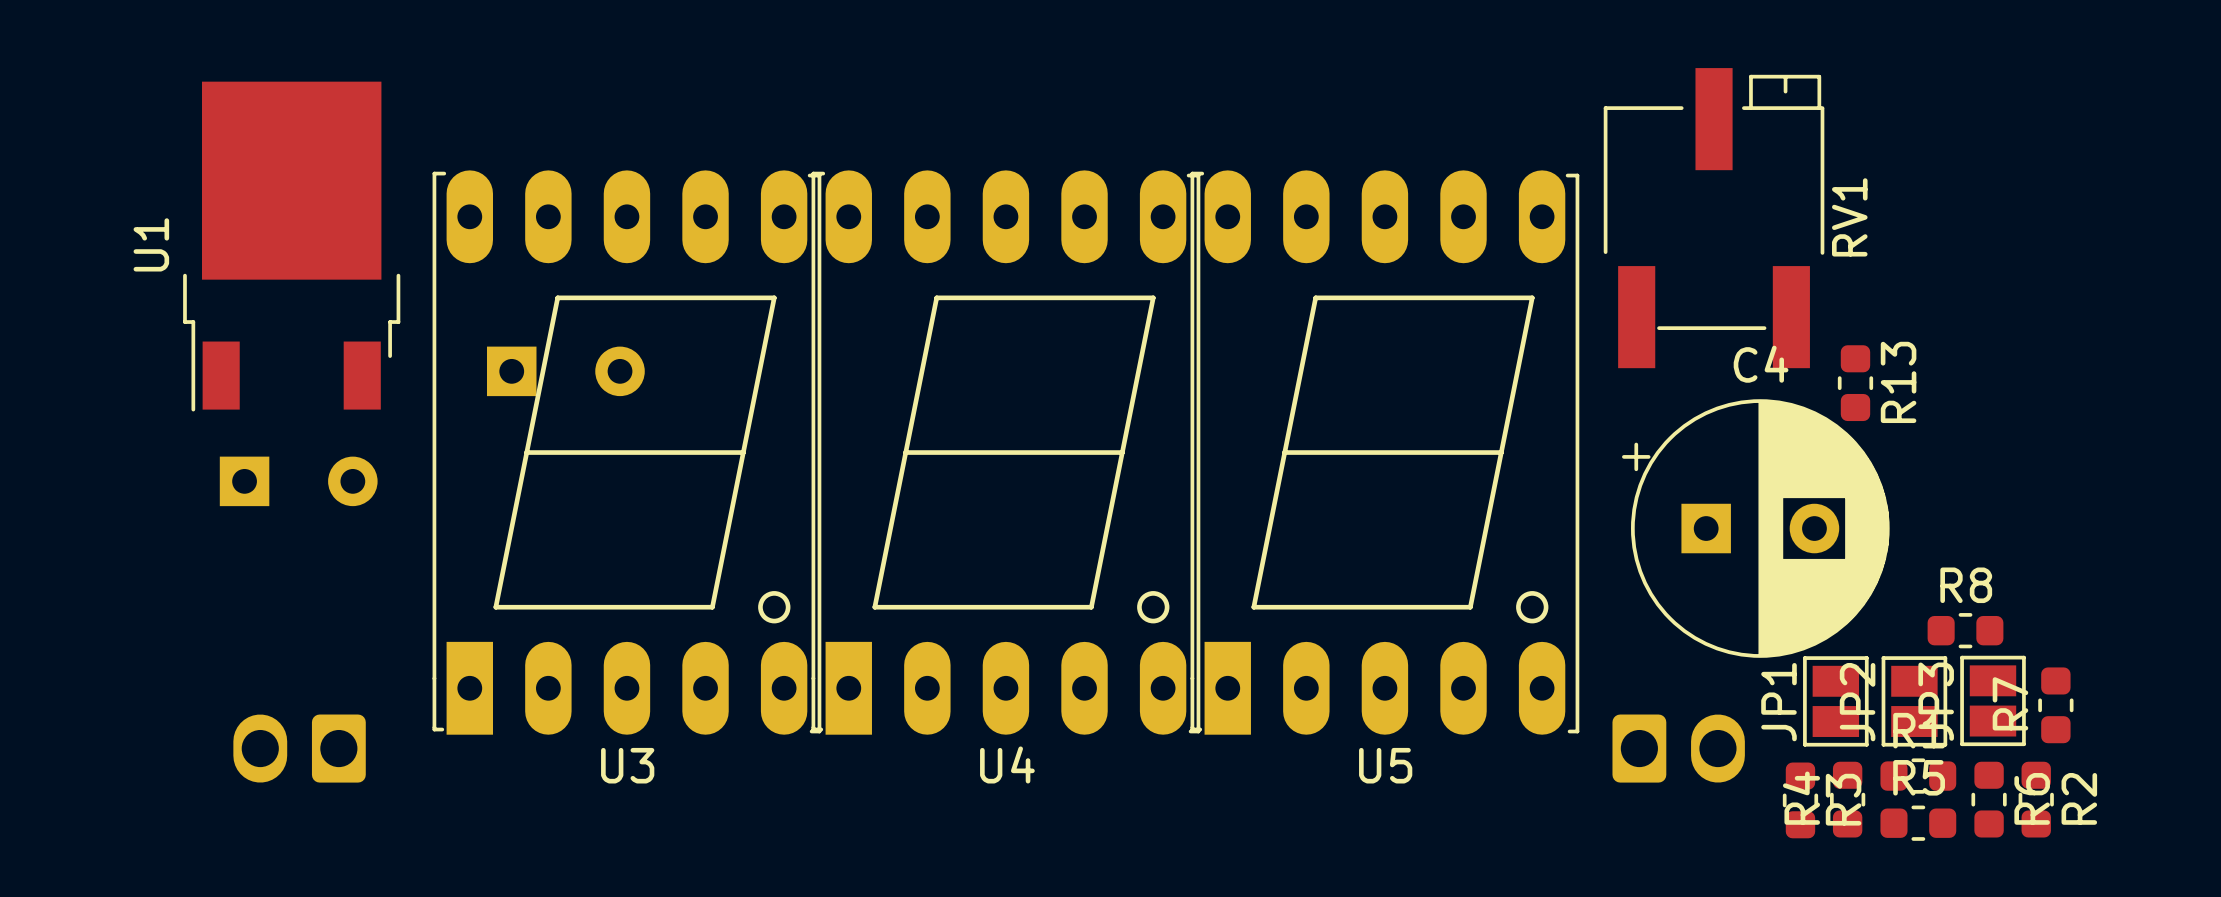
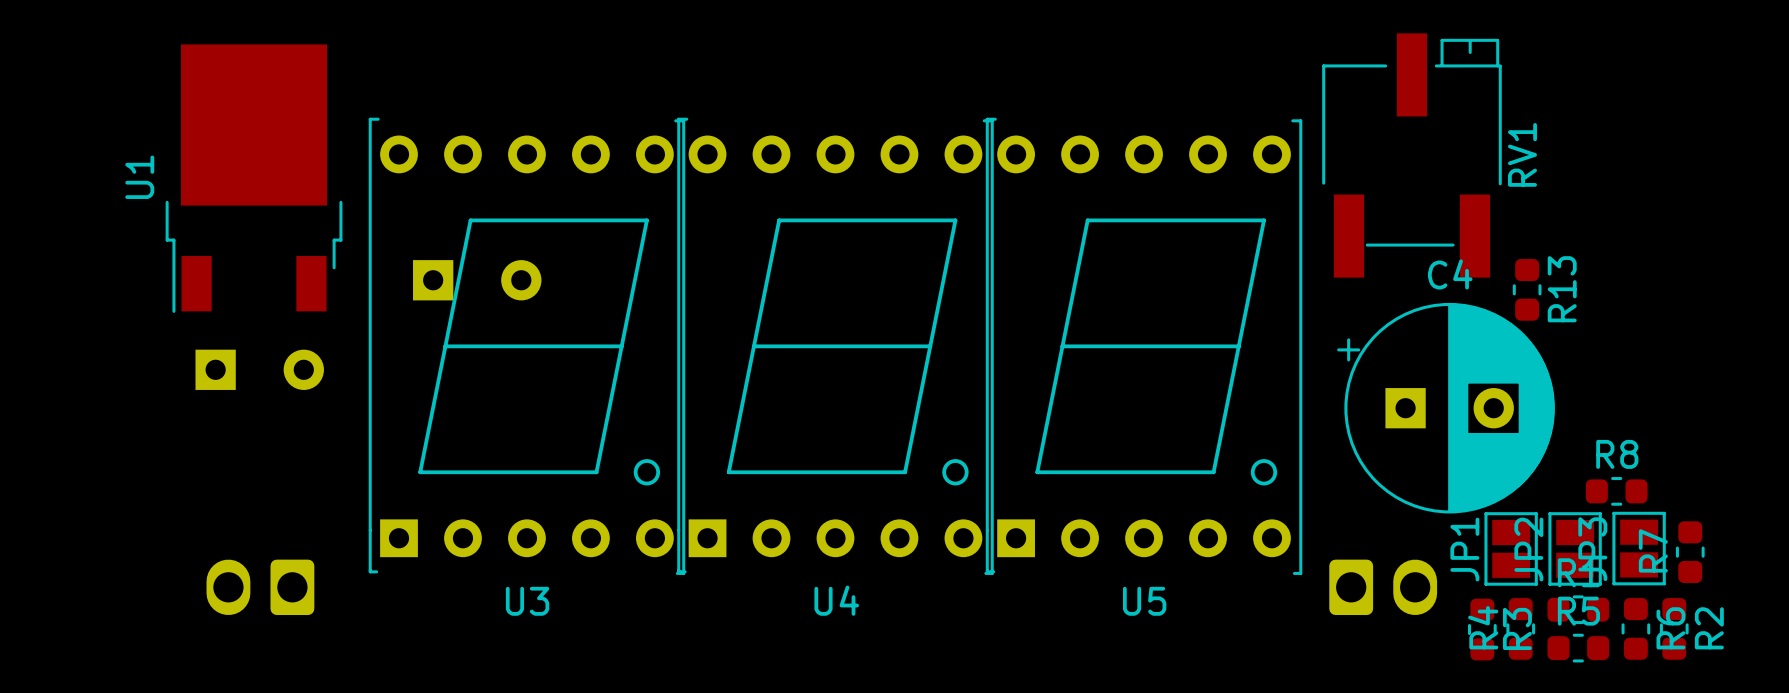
U3 footprint: [432, 170, 822, 735] -> [368, 117, 686, 575]
U4 footprint: [811, 170, 1201, 735] -> [677, 117, 994, 575]
U5 footprint: [1190, 170, 1580, 735] -> [985, 117, 1303, 575]

